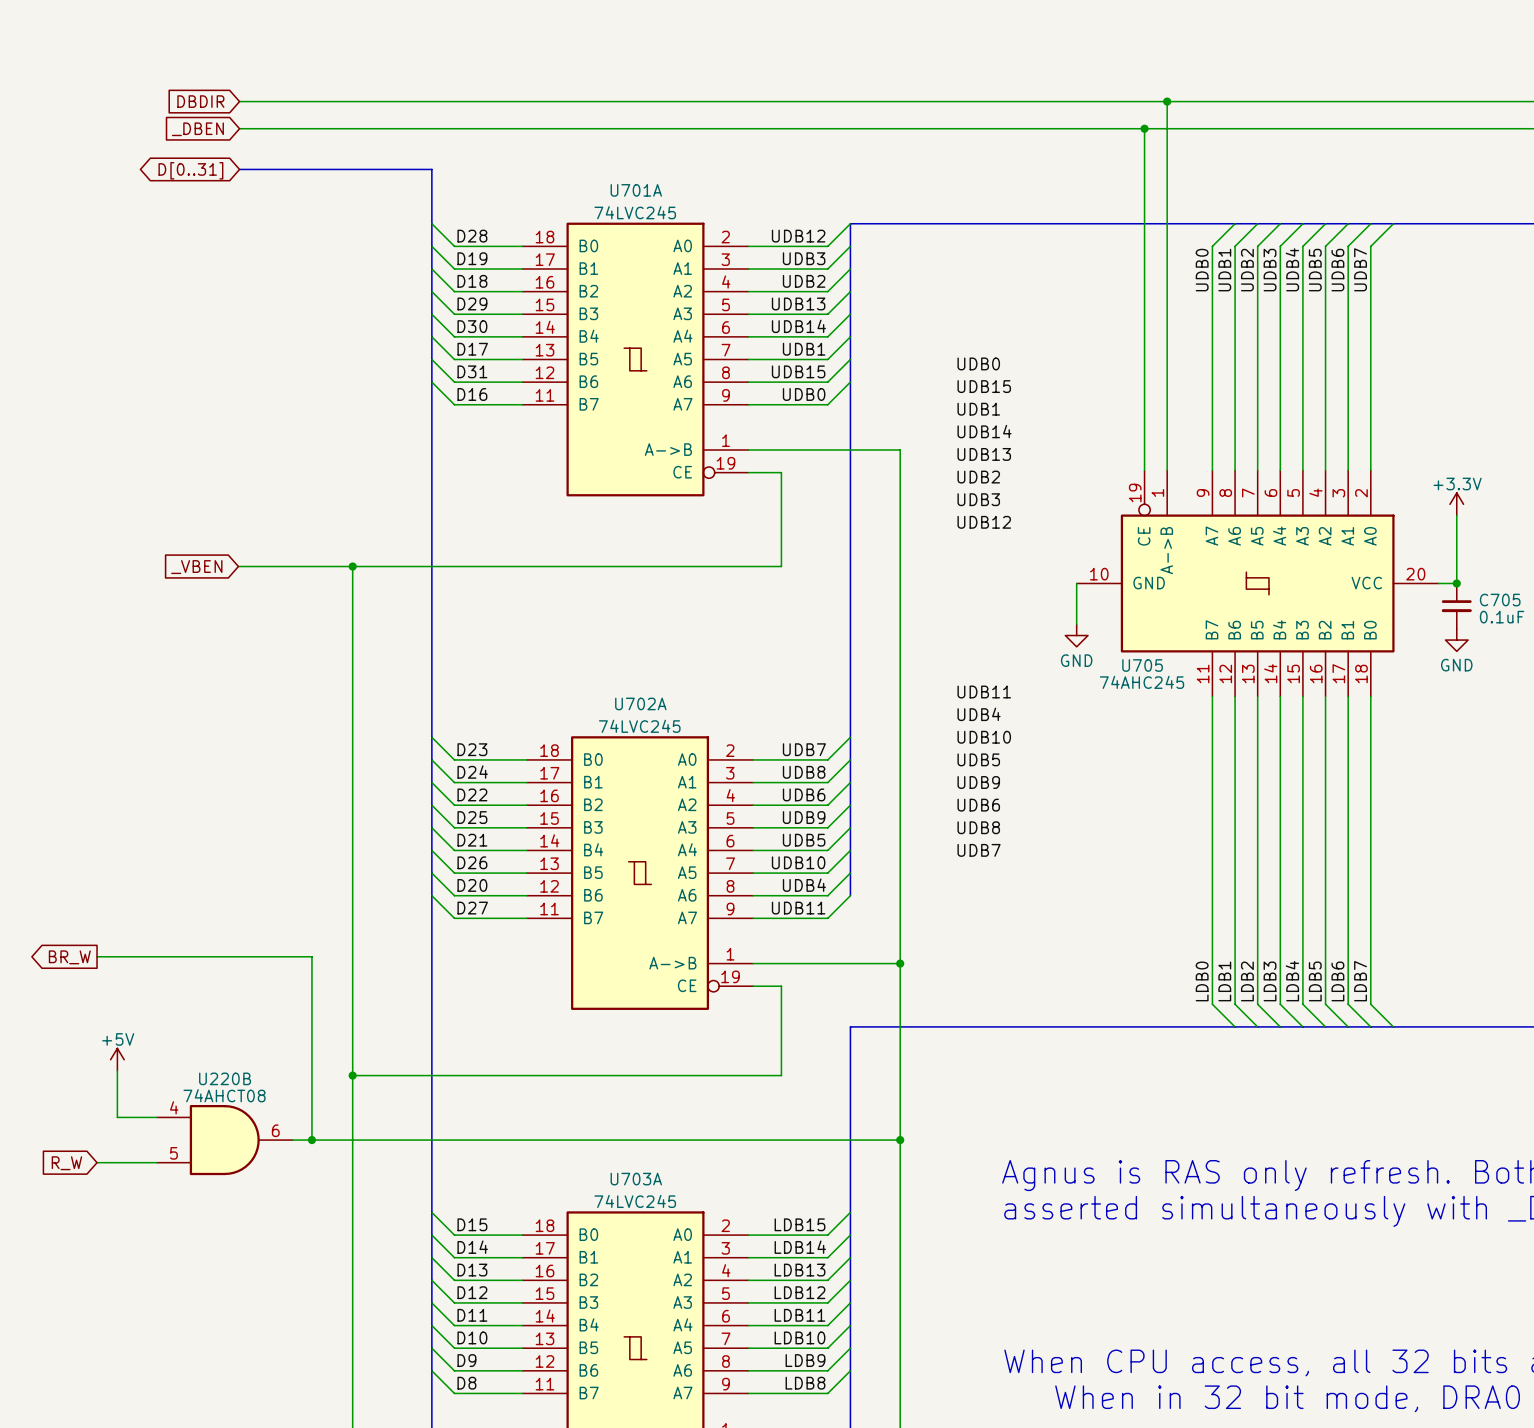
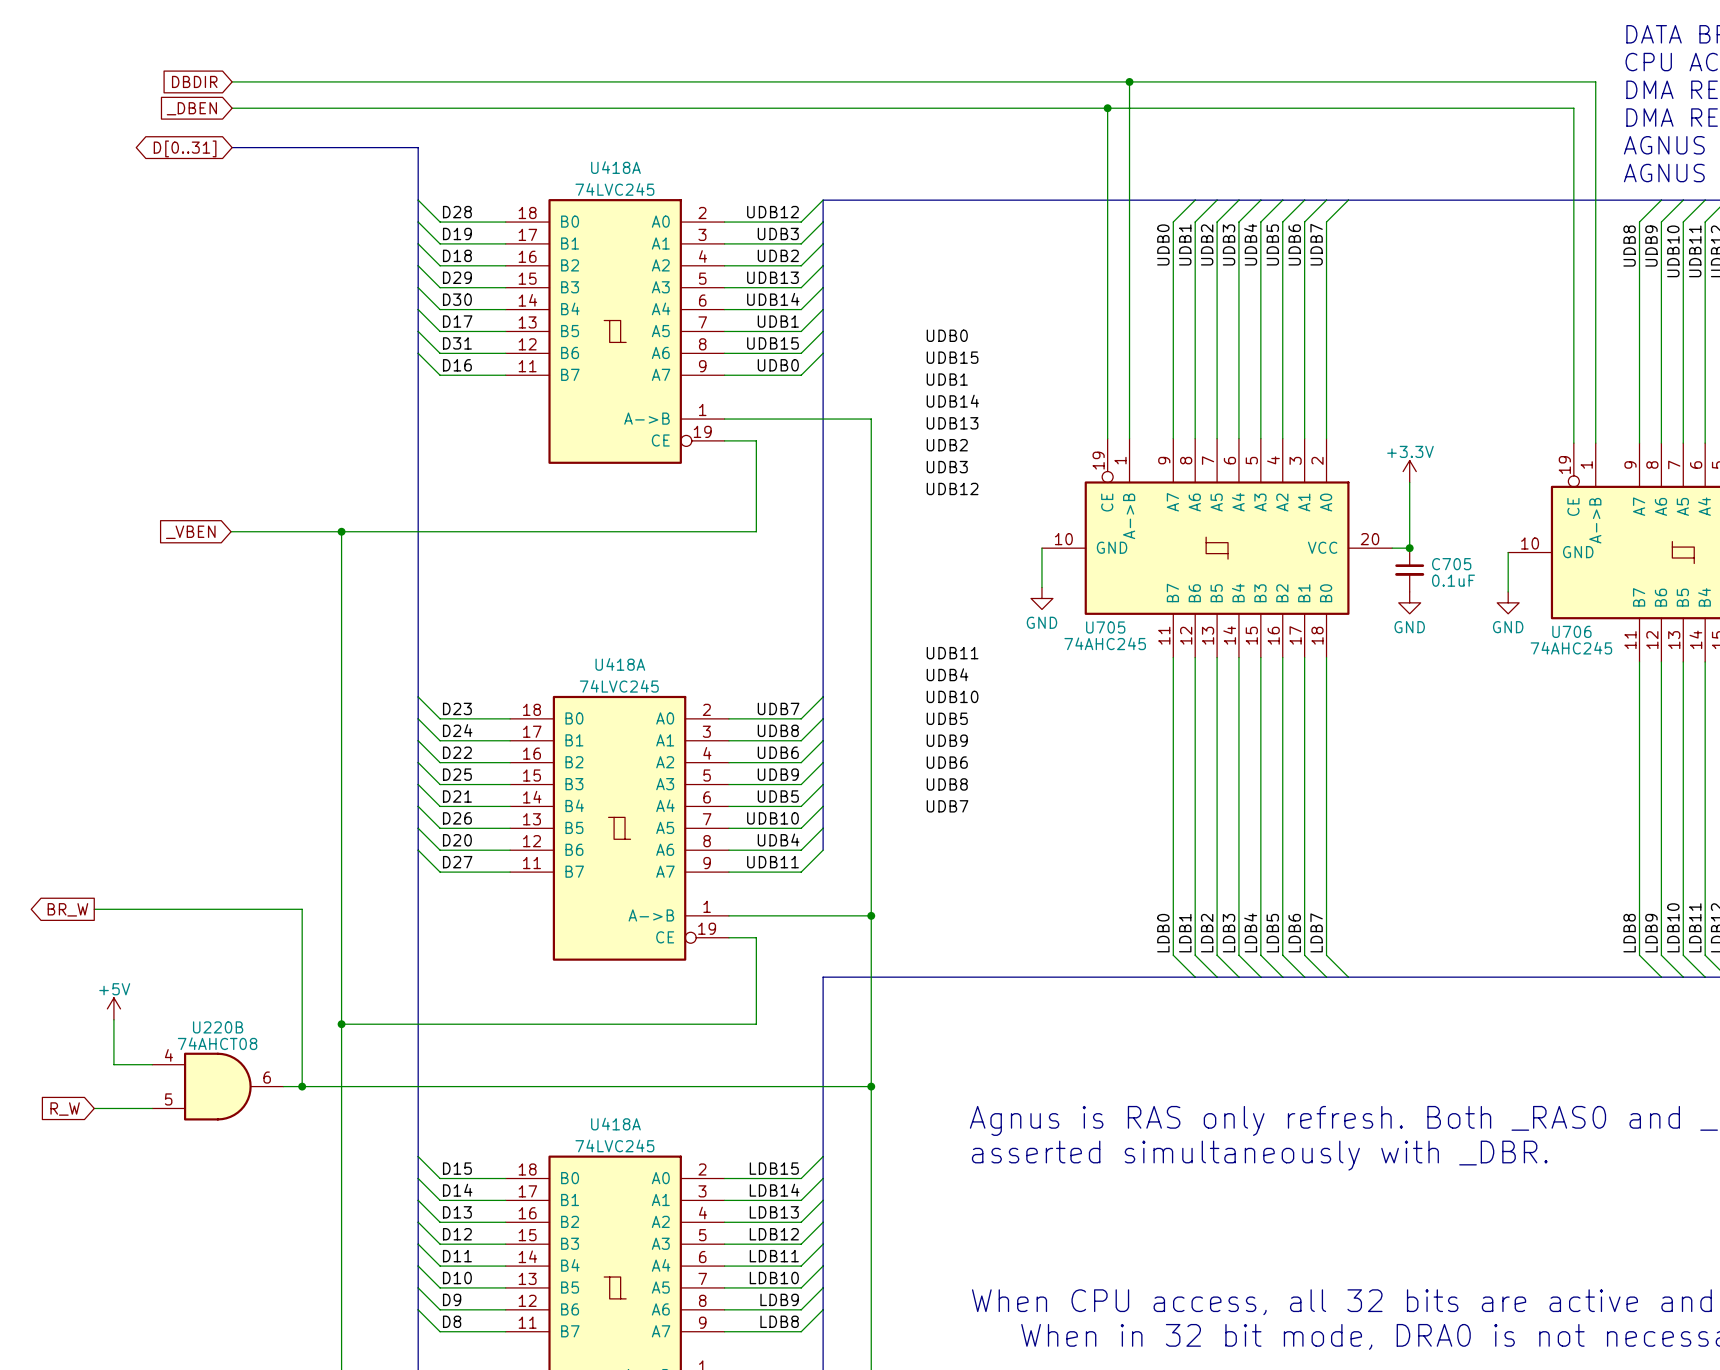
U701A name: U701A (636, 190) -> U418A (615, 167)
U702A name: U702A (640, 703) -> U418A (620, 664)
U703A name: U703A (636, 1179) -> U418A (615, 1124)

